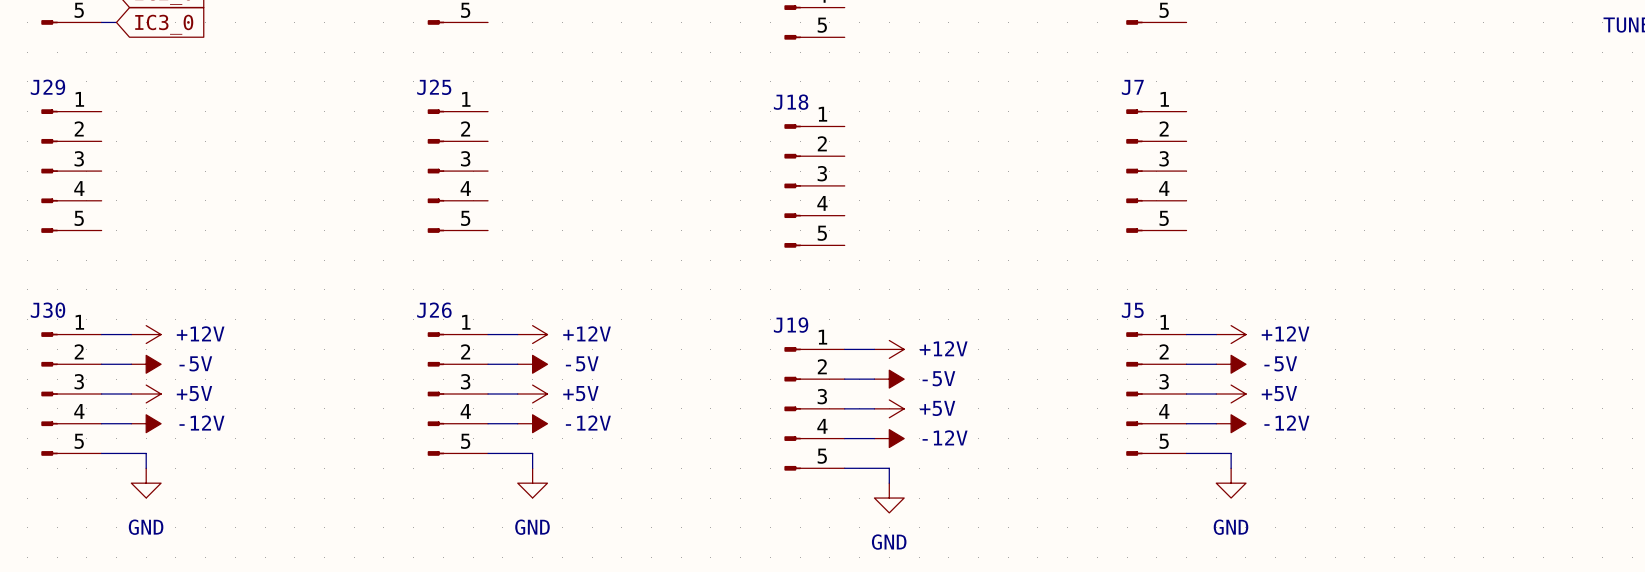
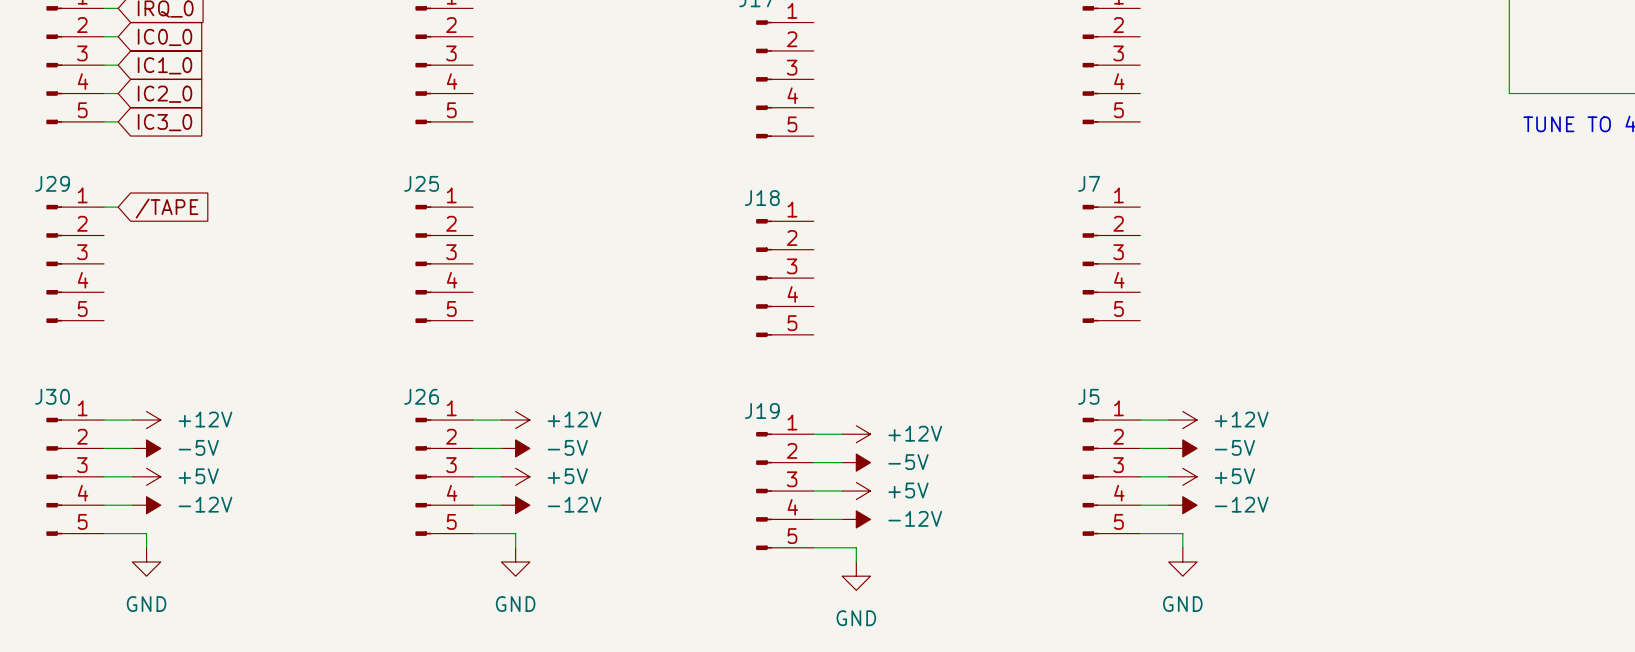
wire: none -> (103, 207) (118, 207)
global label: none -> /TAPE (167, 208)

